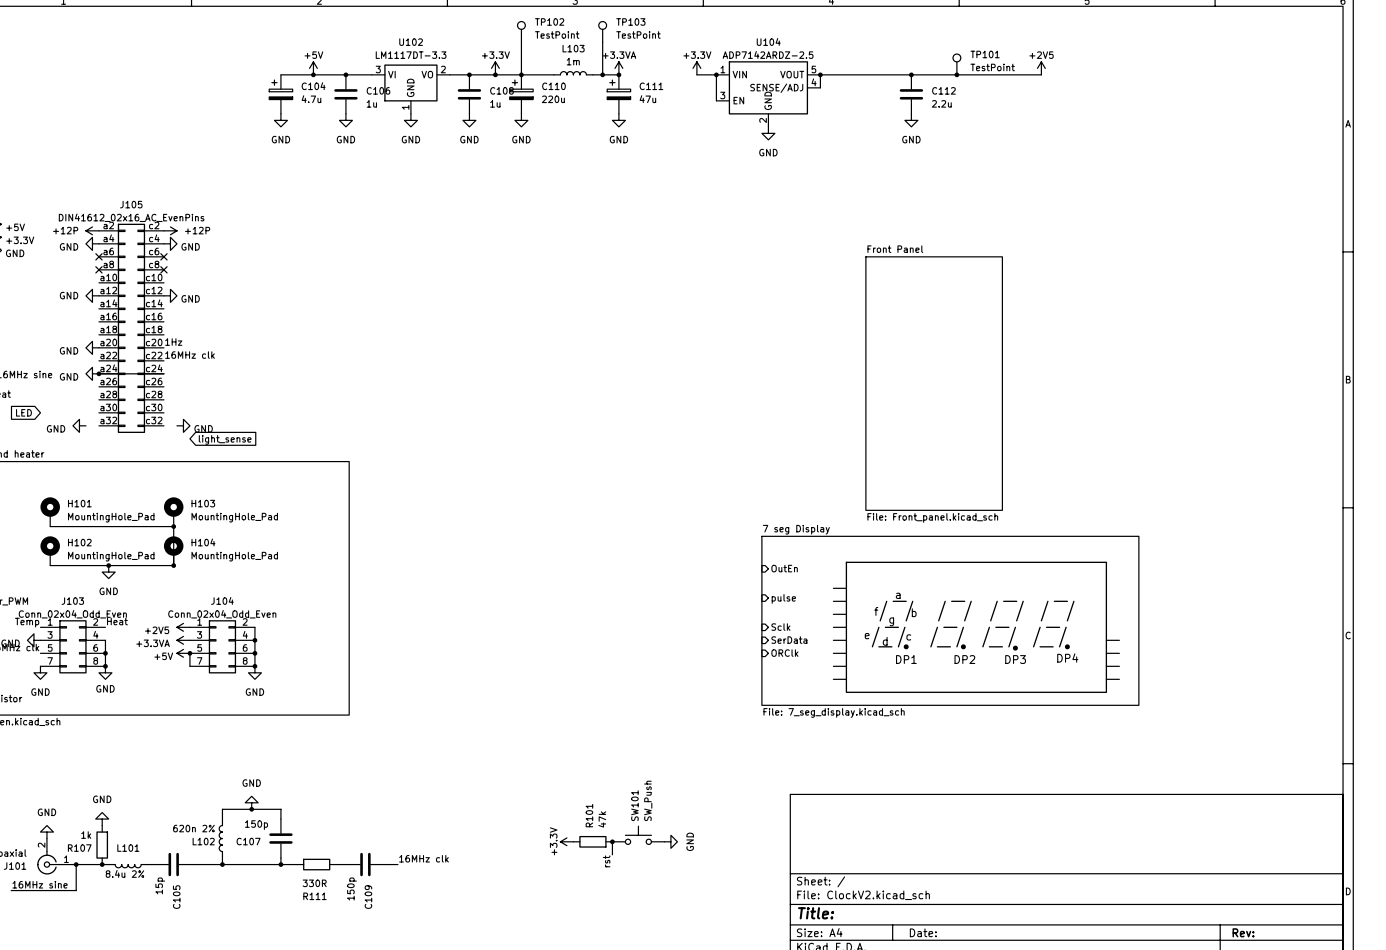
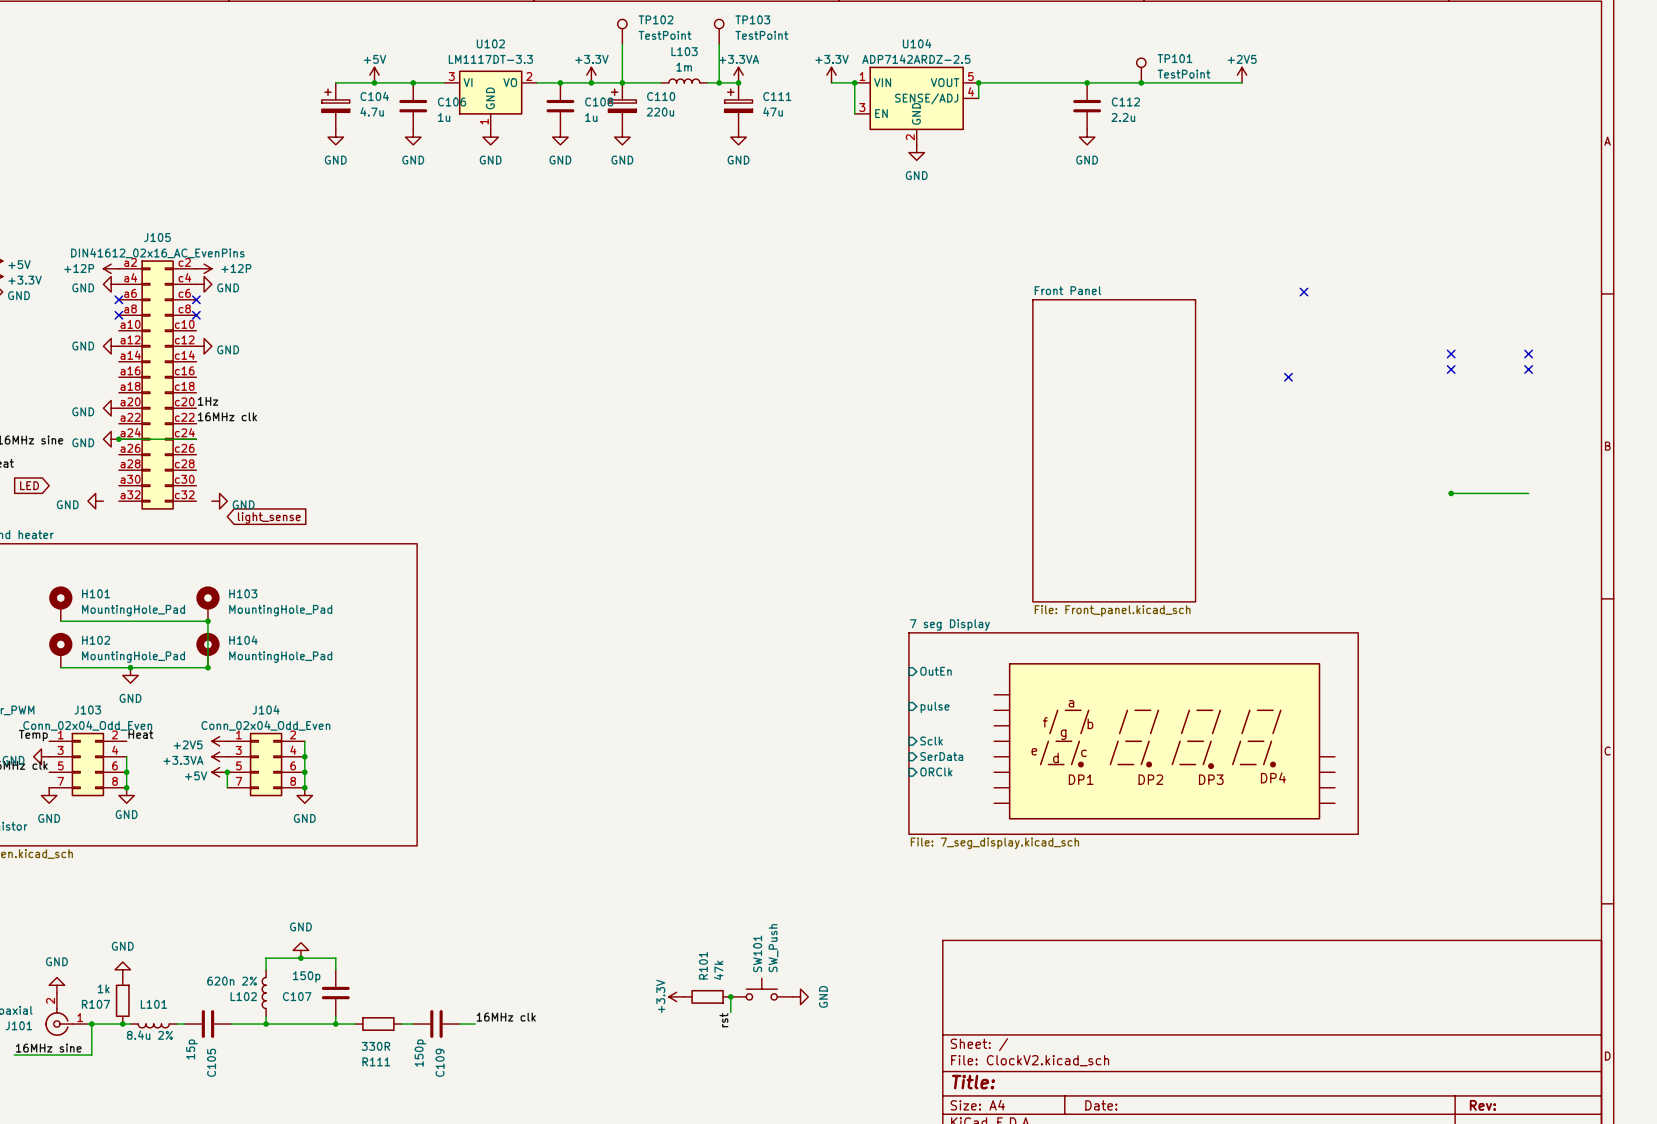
no-connect mark: none -> (1303, 292)
no-connect mark: none -> (1451, 354)
no-connect mark: none -> (1528, 354)
no-connect mark: none -> (1451, 369)
no-connect mark: none -> (1528, 369)
no-connect mark: none -> (1288, 377)
wire: none -> (1451, 493) (1528, 493)
junction: none -> (1451, 493)

